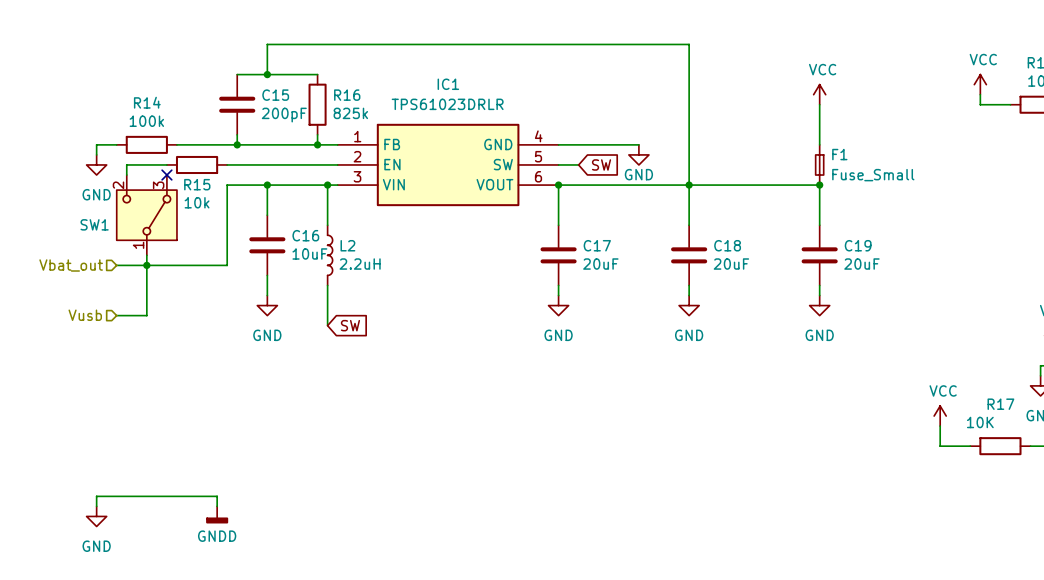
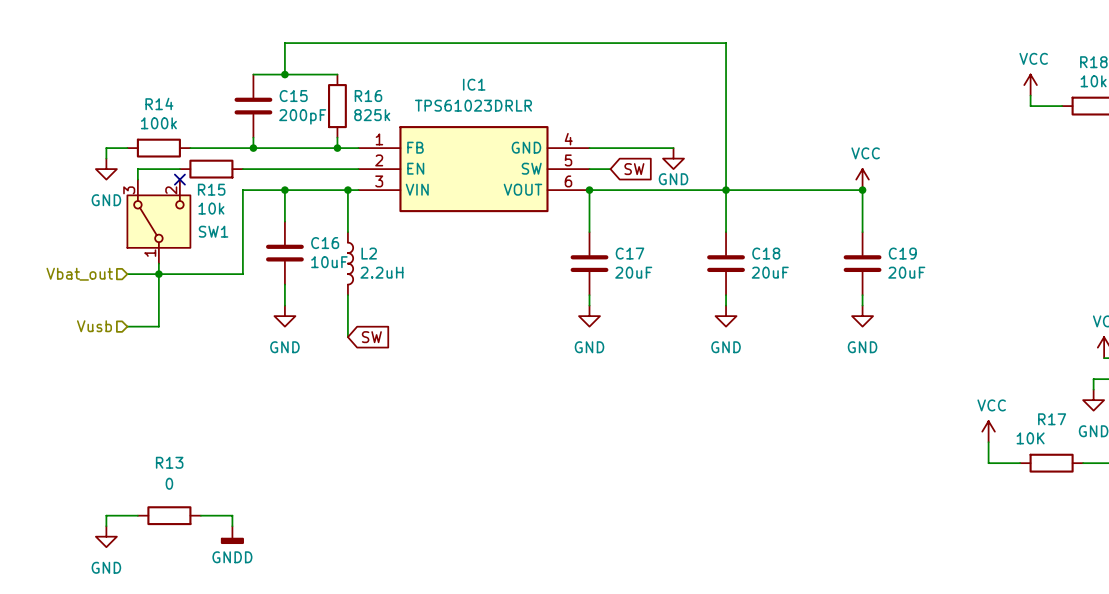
power symbol position: VCC (819, 94) -> VCC (862, 179)
wire: (819, 104) (819, 144) -> none
F1: Fuse_Small (819, 164) -> none
SW1 flip: as is (146, 215) -> left-right (158, 221)
wire: (126, 496) (187, 496) -> none
R13: none -> 0 (169, 515)

